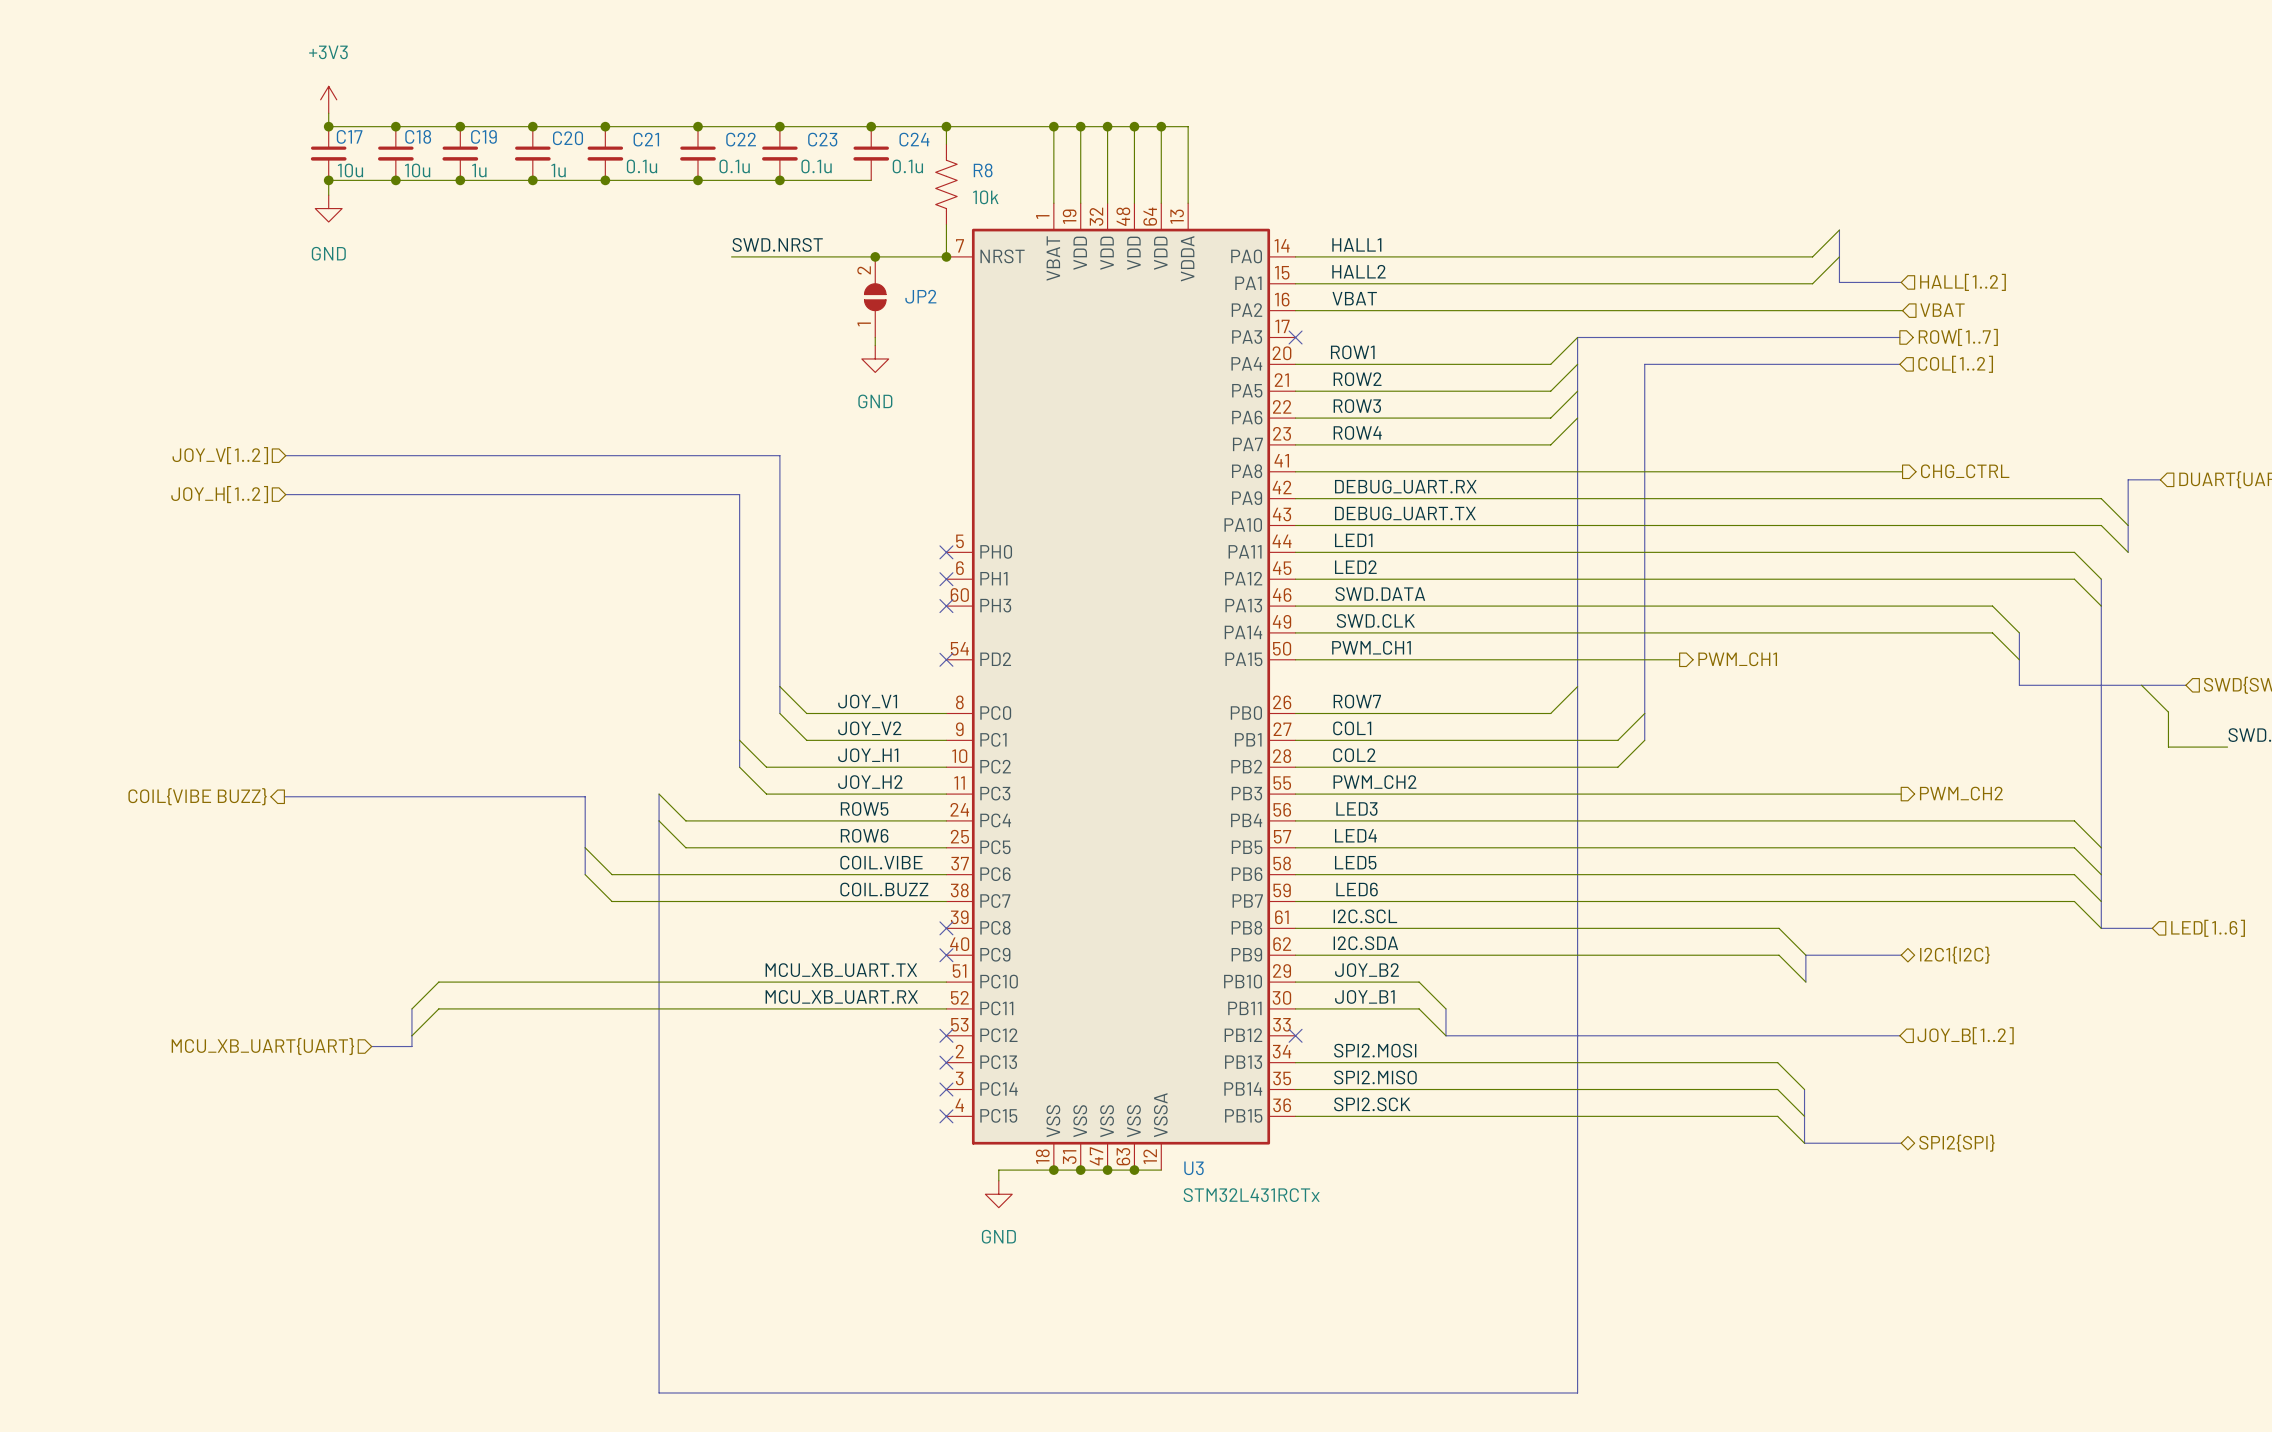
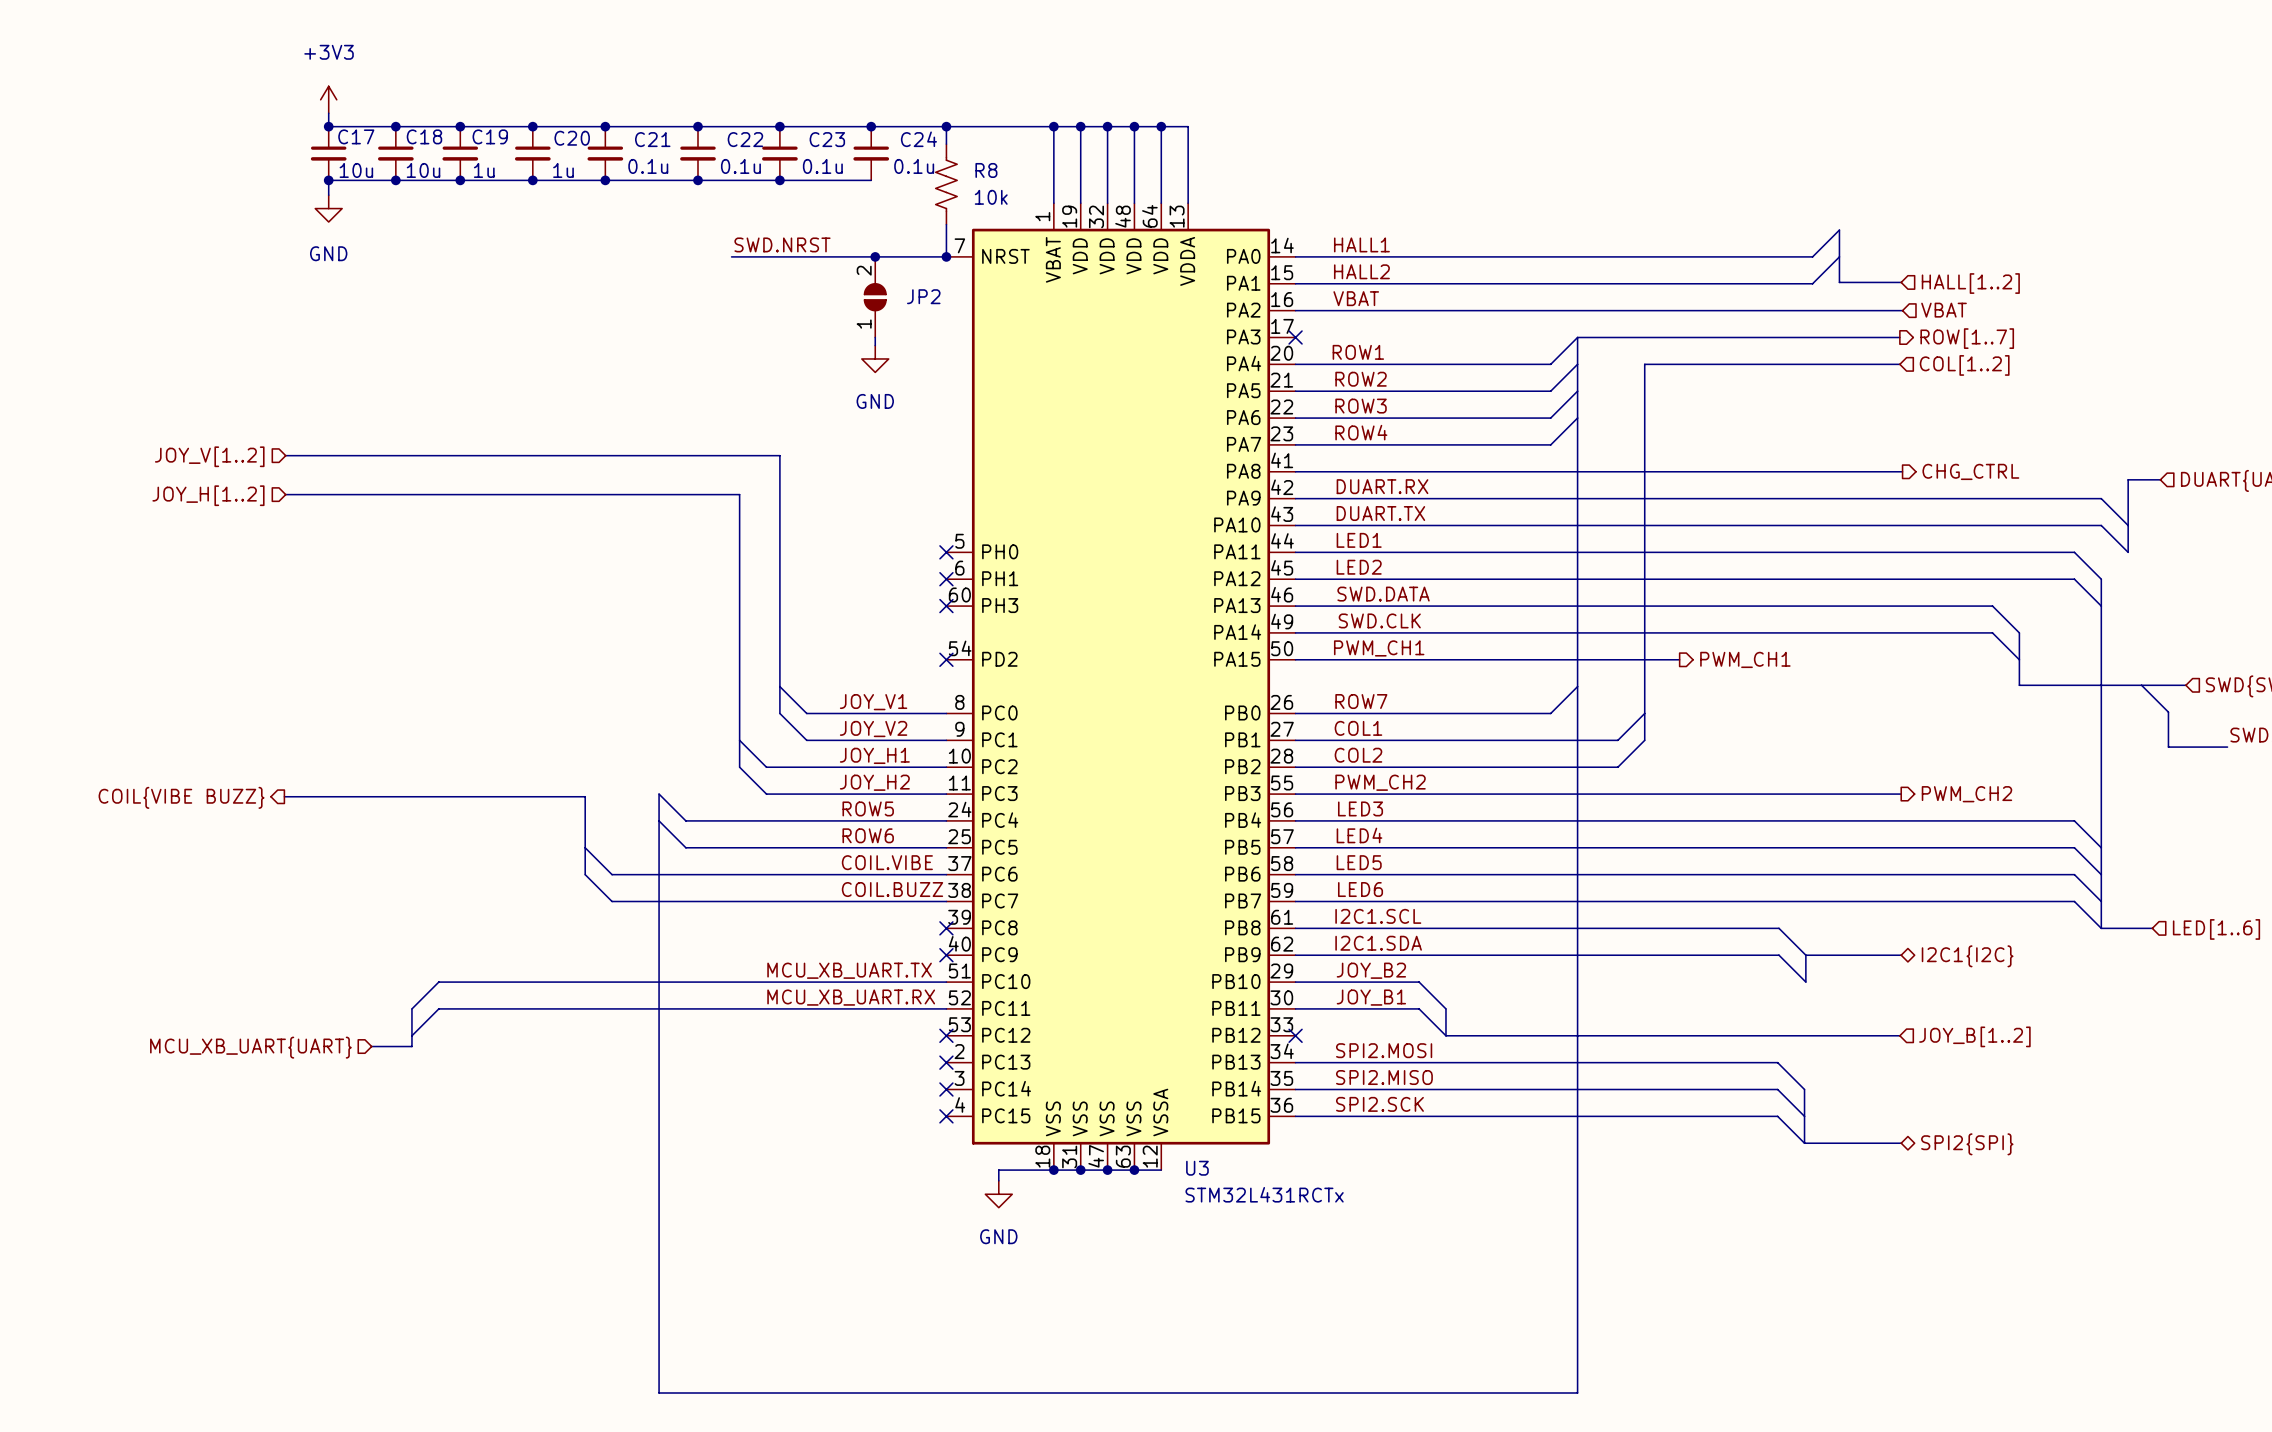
label: DEBUG_UART.RX (1405, 486) -> DUART.RX (1382, 486)
label: DEBUG_UART.TX (1405, 513) -> DUART.TX (1380, 513)
label: I2C.SCL (1365, 916) -> I2C1.SCL (1378, 916)
label: I2C.SDA (1365, 943) -> I2C1.SDA (1378, 943)

